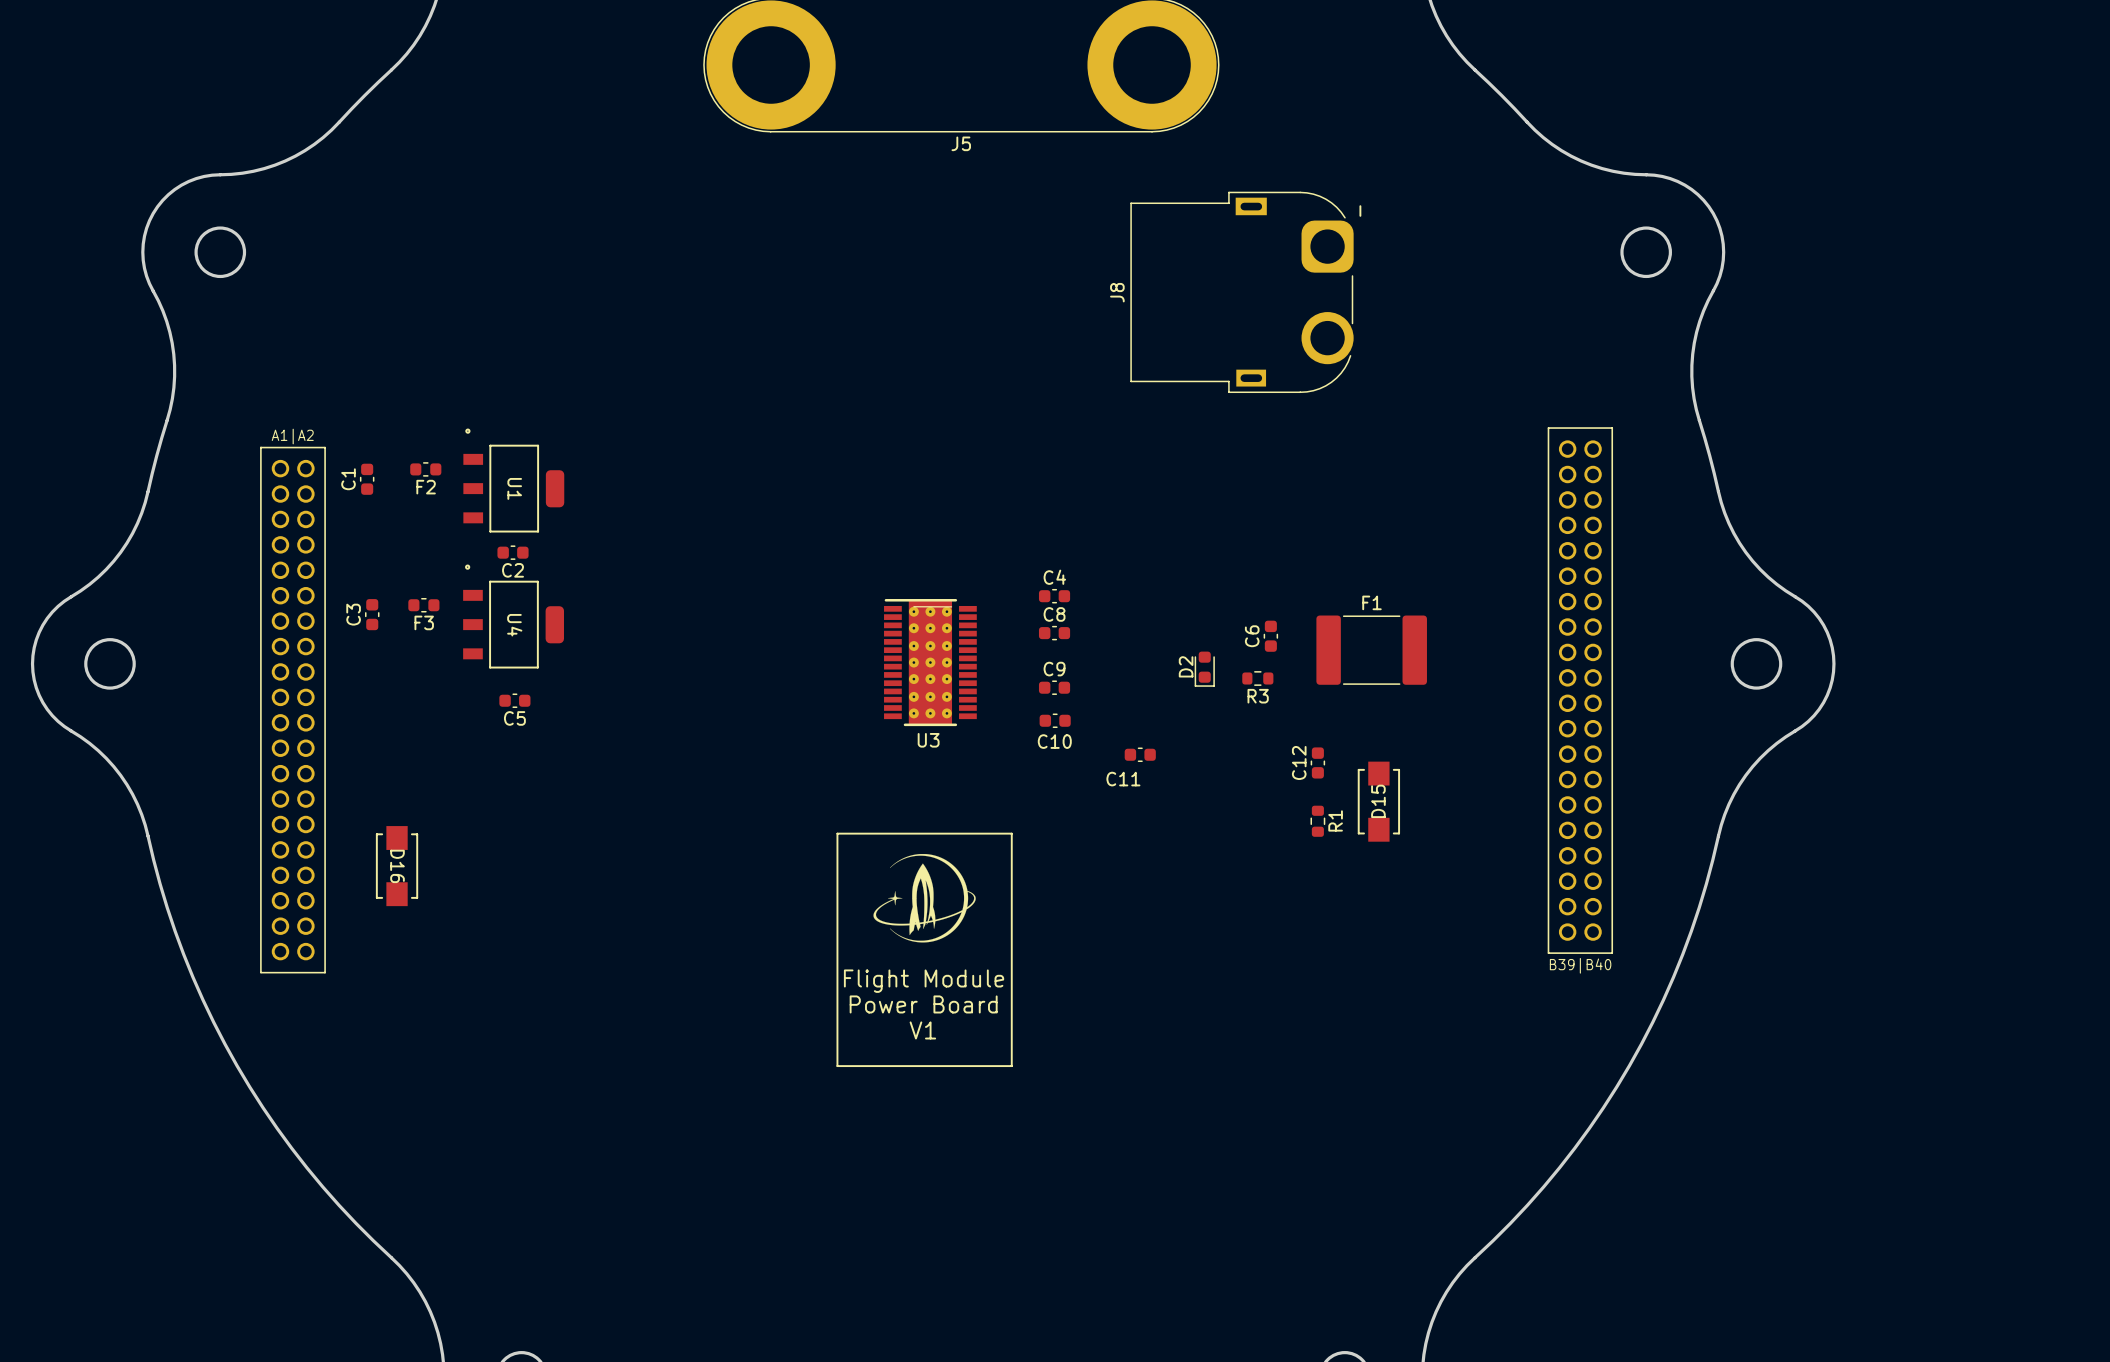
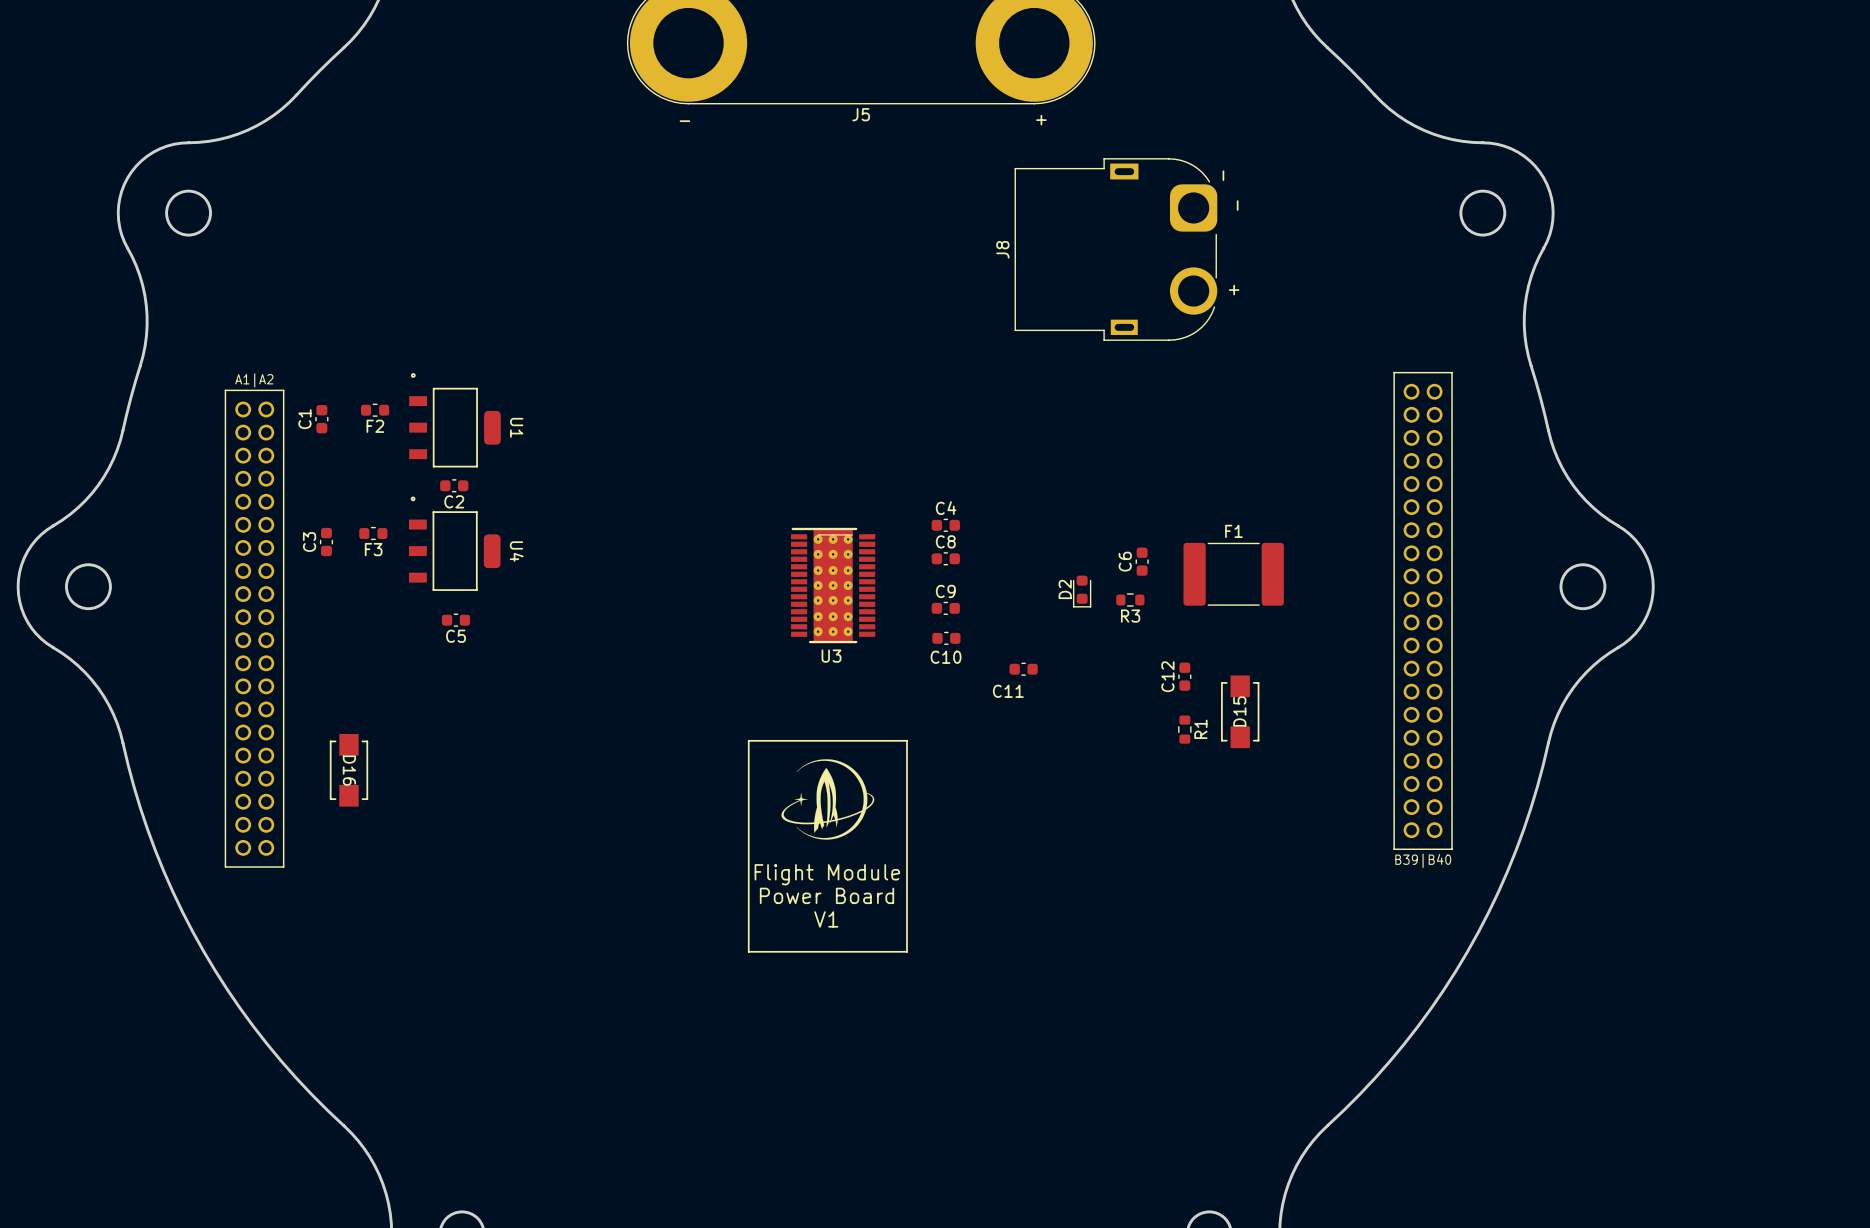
text: none -> + (1041, 120)
text: none -> - (684, 121)
text: none -> - (1237, 205)
text: none -> + (1234, 290)
U1 name position: U1 (514, 488) -> U1 (516, 427)
U4 name position: U4 (514, 625) -> U4 (516, 551)

